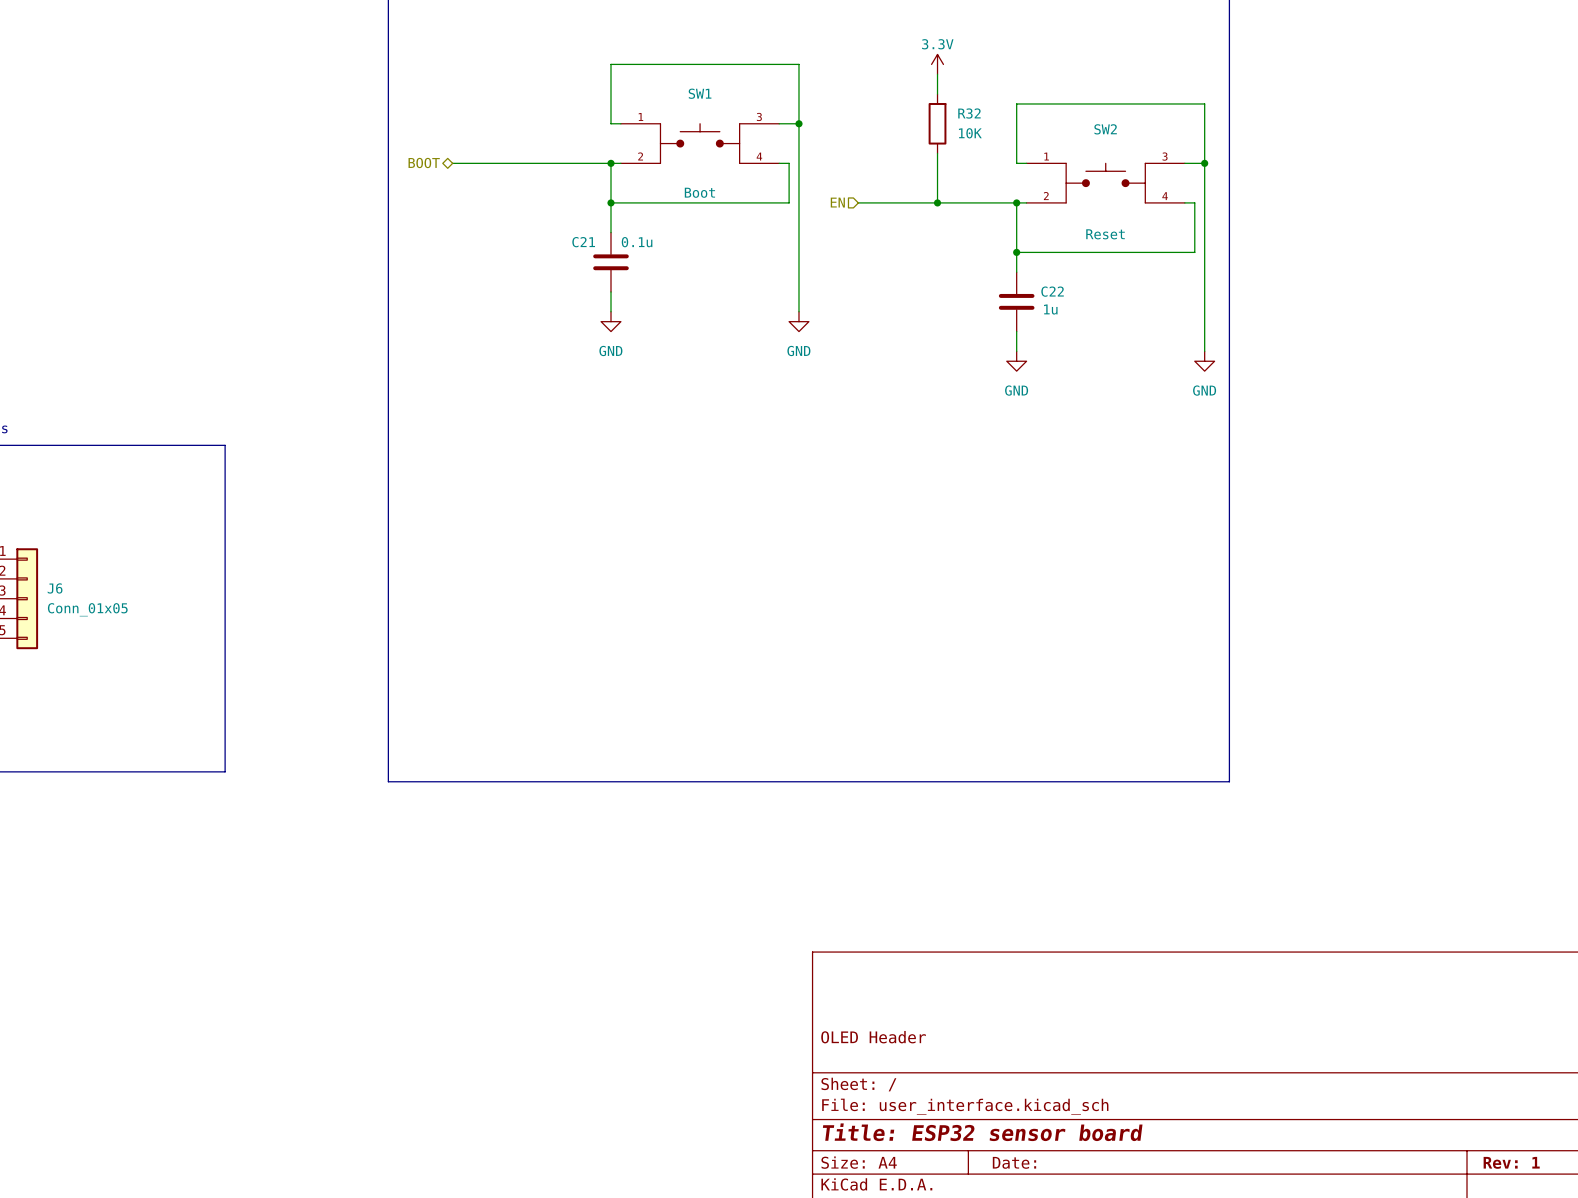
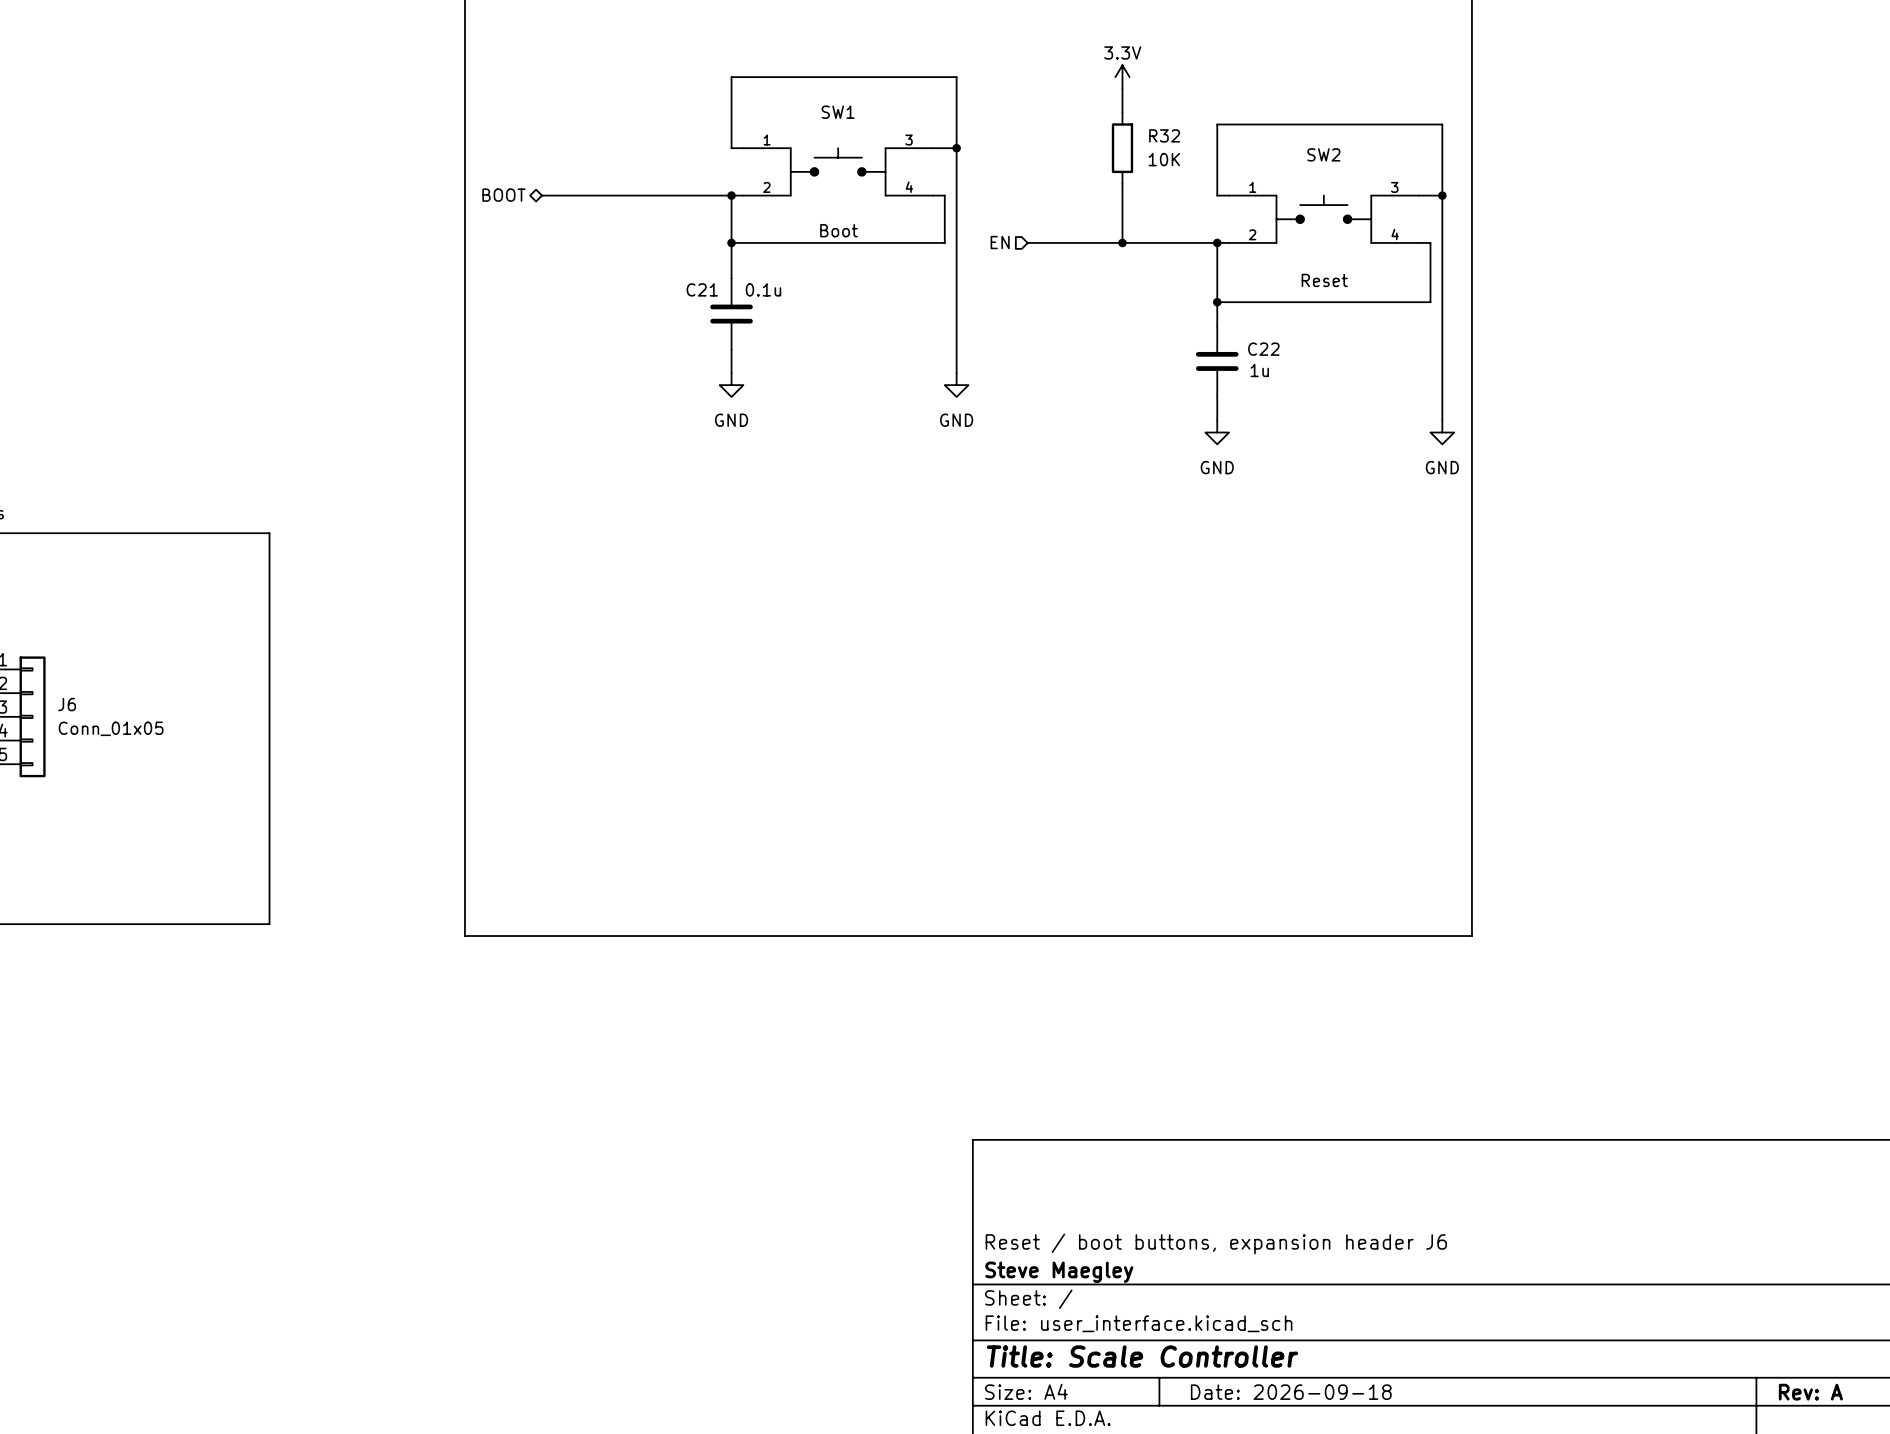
title block: OLED Header (873, 1037) -> Reset / boot buttons, expansion header J6 (1216, 1243)
title block: none -> Steve Maegley (1059, 1272)
title block: Title: ESP32 sensor board (982, 1132) -> Title: Scale Controller (1142, 1356)
title block: Date: (1014, 1162) -> Date: 2026-09-18 (1291, 1392)
title block: Rev: 1 (1511, 1162) -> Rev: A (1810, 1392)

